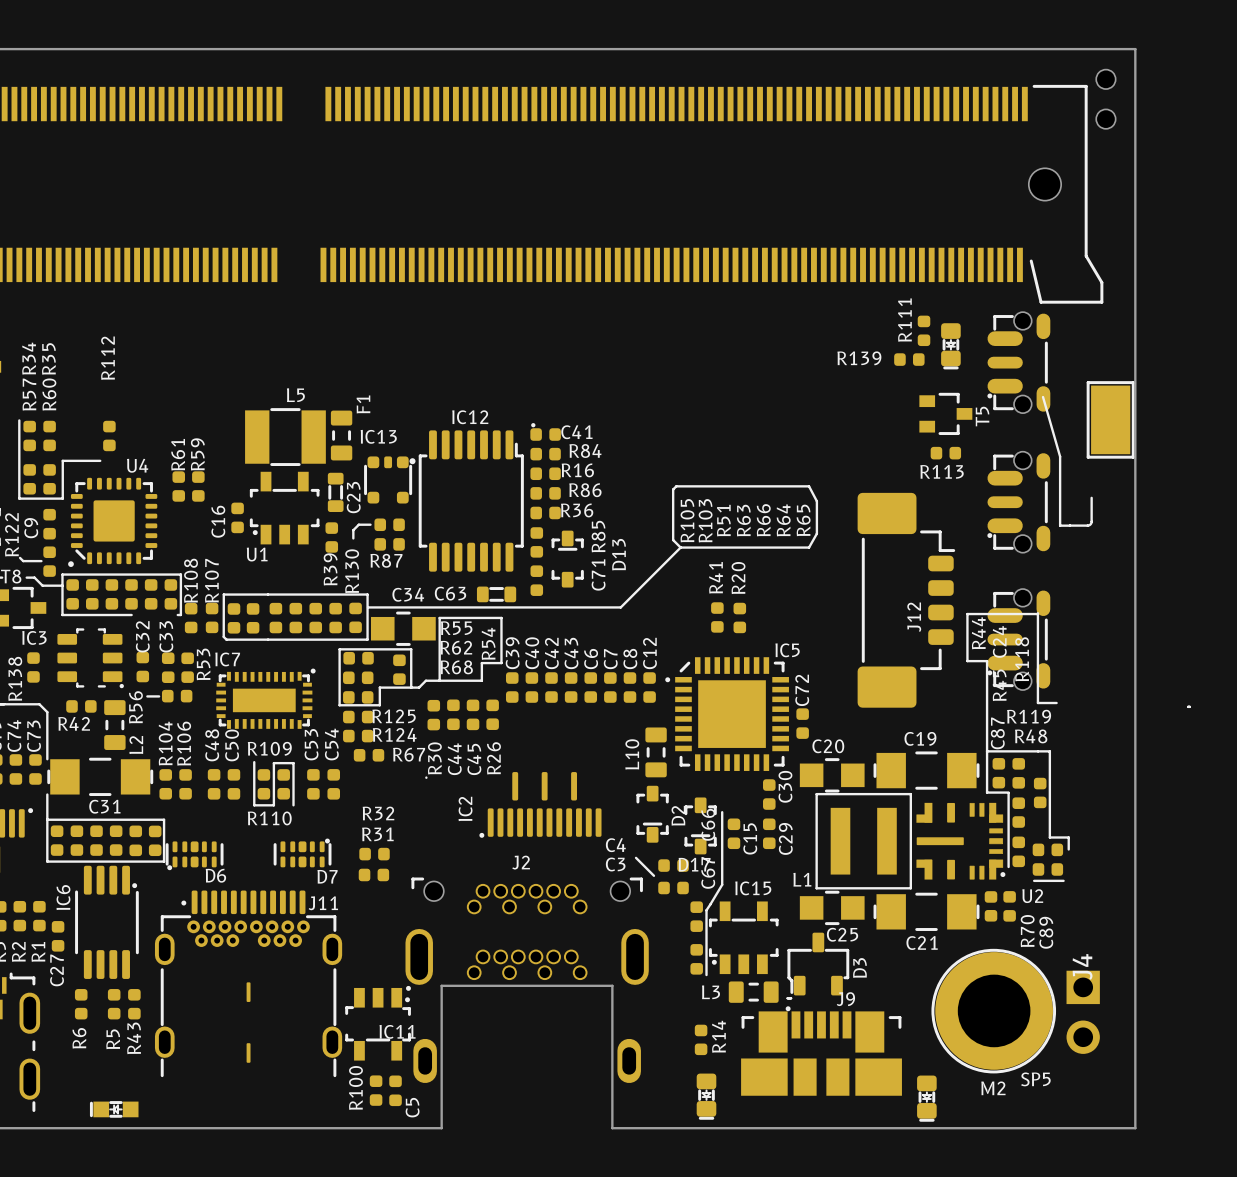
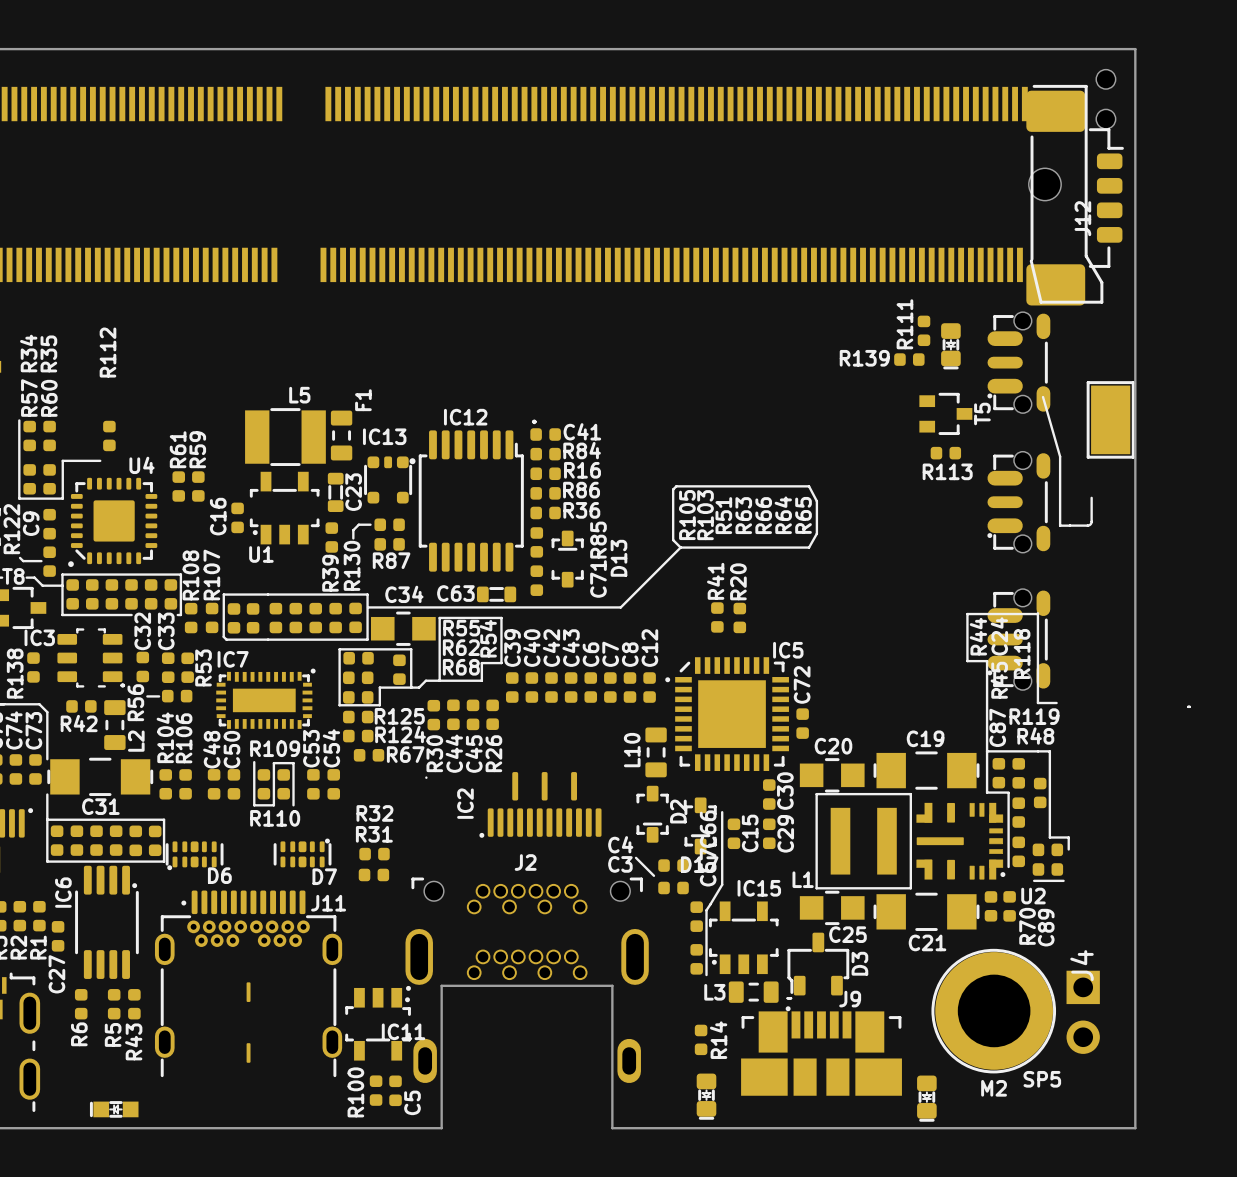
J12 position: (906, 600) -> (1075, 198)

